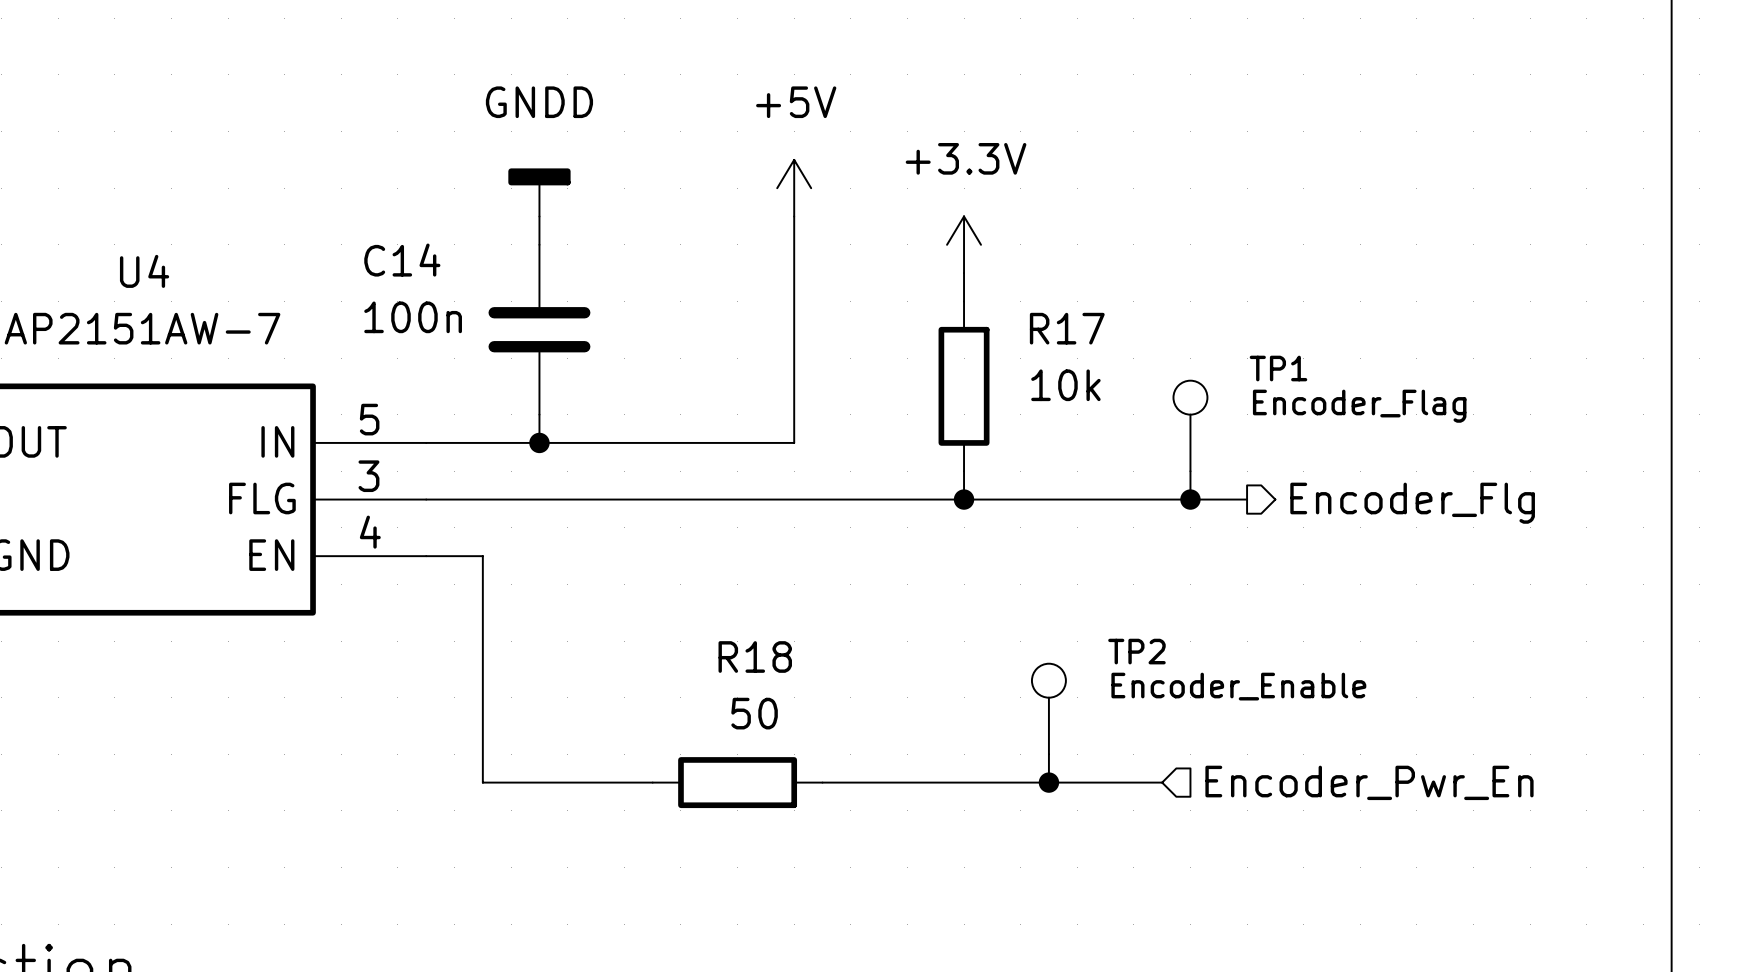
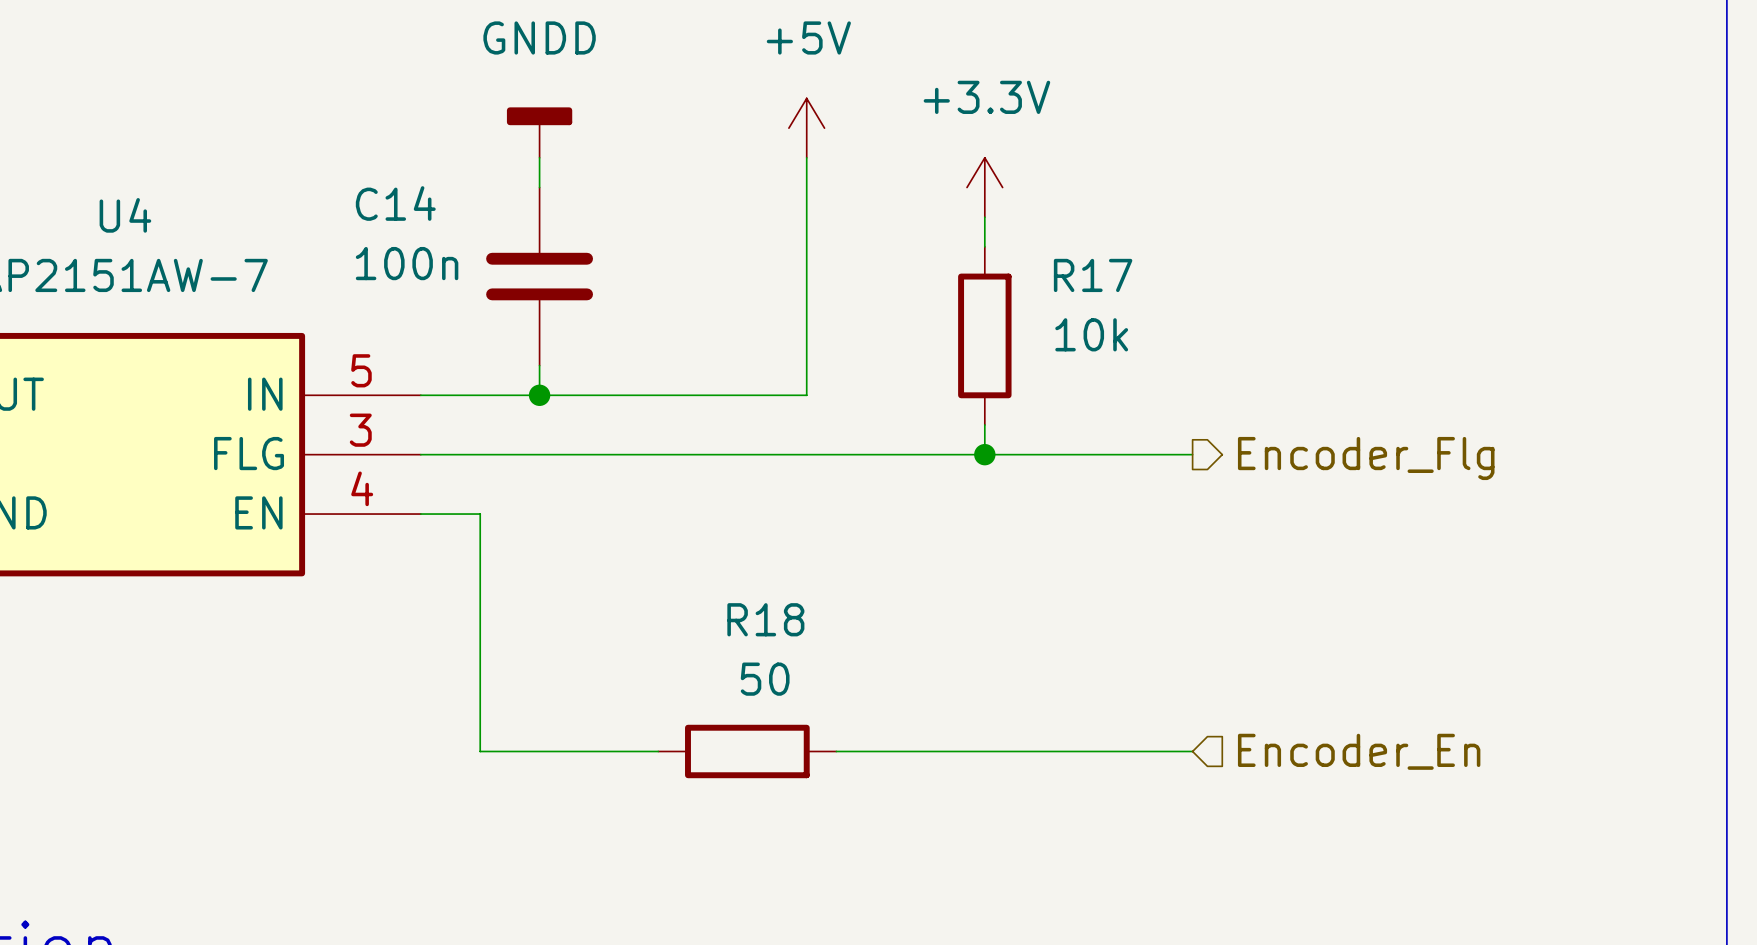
TP1: Encoder_Flag (1190, 425) -> none
wire: (1190, 471) (1190, 499) -> none
wire: (1162, 499) (1247, 499) -> none
junction: (1190, 499) -> none
hierarchical label position: Encoder_Flg (1412, 503) -> Encoder_Flg (1366, 458)
TP2: Encoder_Enable (1048, 709) -> none
wire: (1048, 754) (1048, 782) -> none
junction: (1048, 782) -> none
hierarchical label: Encoder_Pwr_En (1369, 782) -> Encoder_En (1359, 751)

